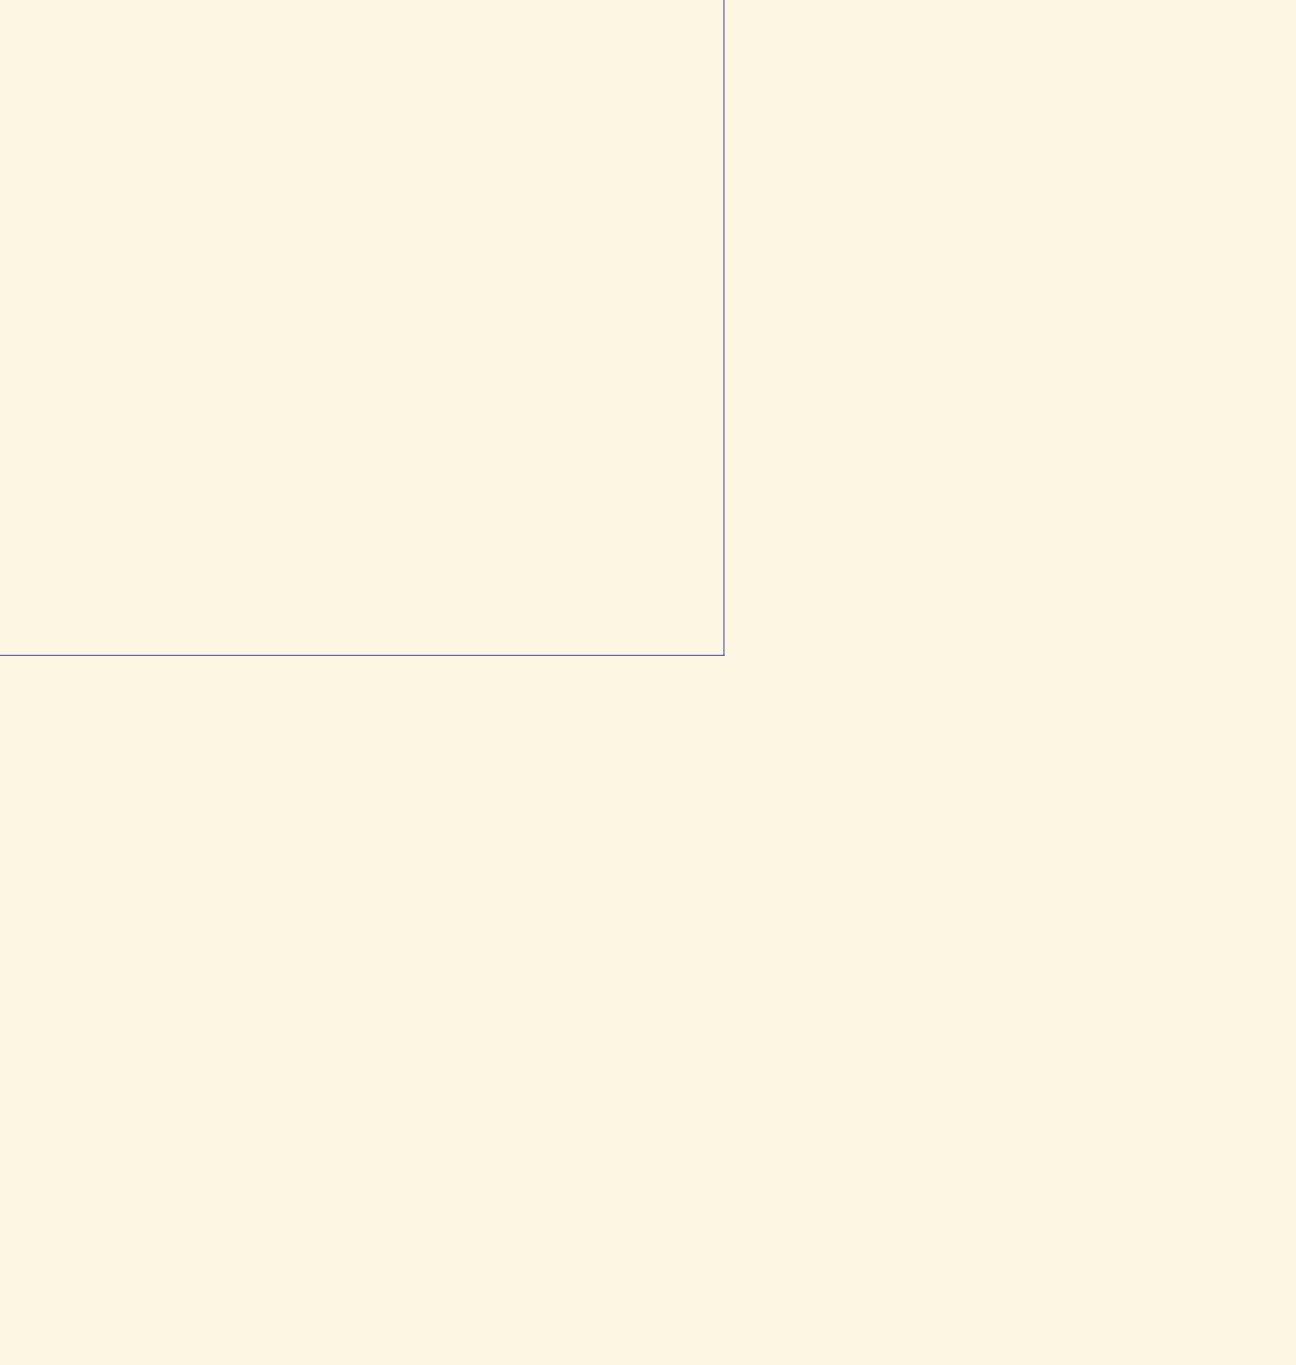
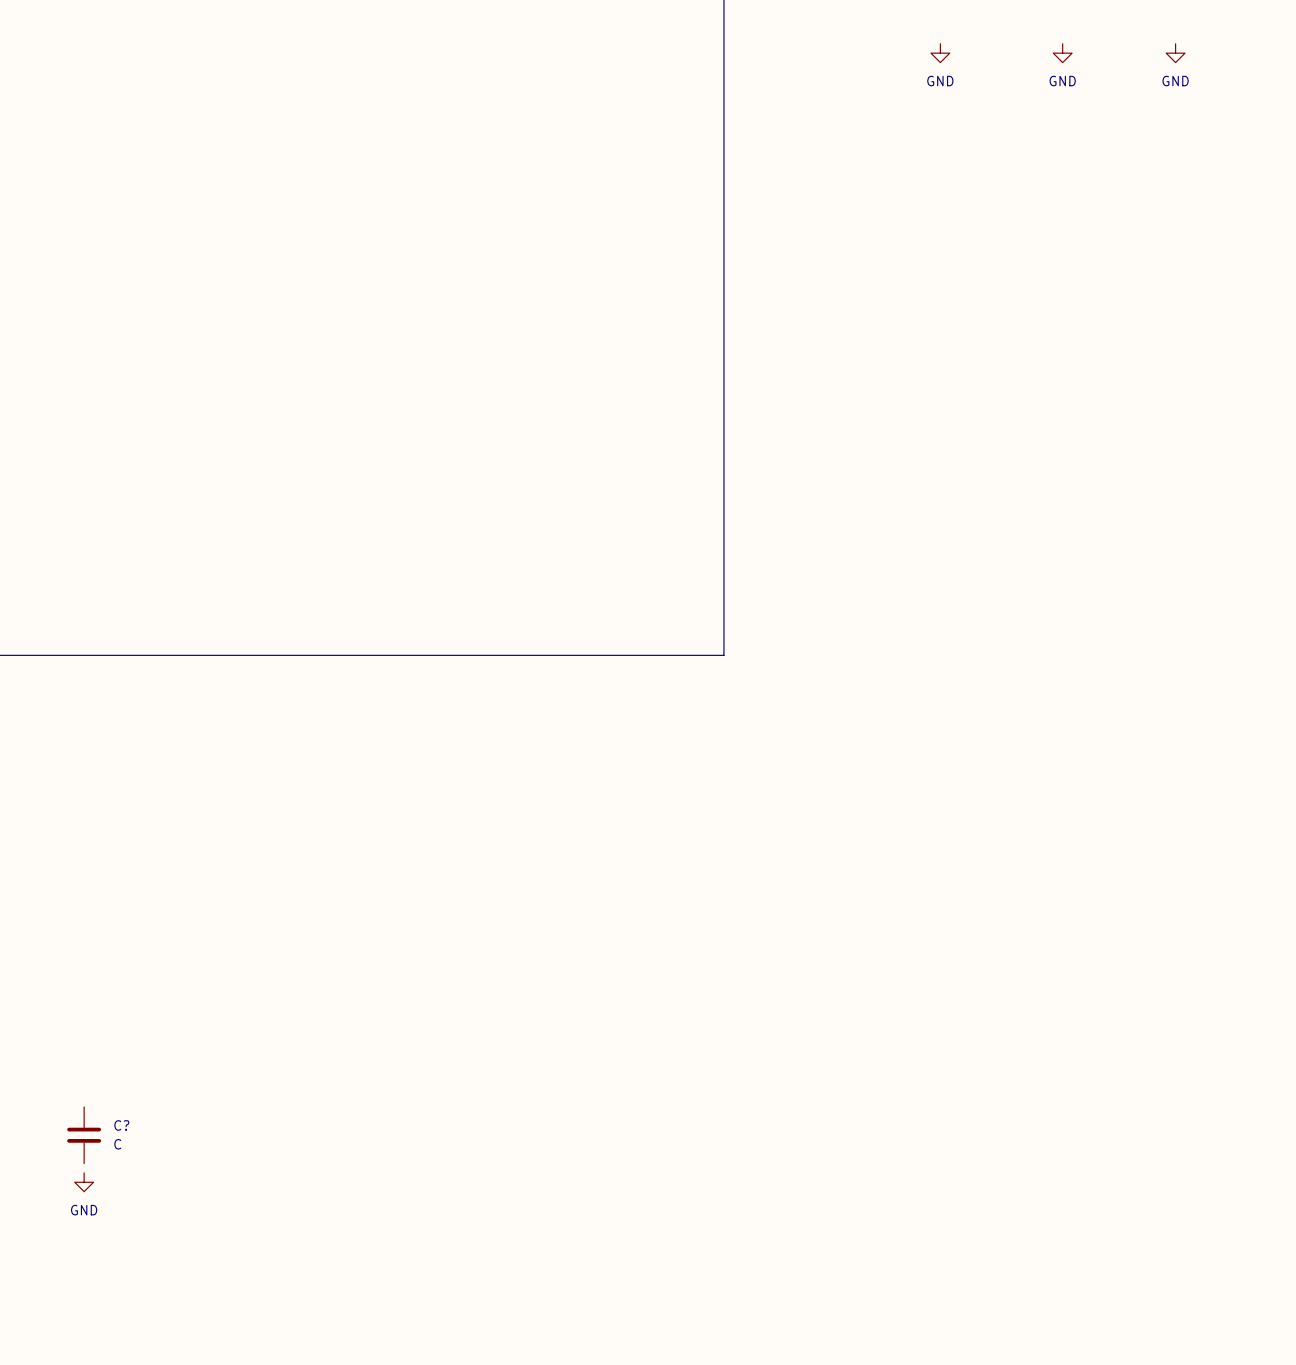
power symbol: none -> GND (940, 53)
power symbol: none -> GND (1062, 53)
power symbol: none -> GND (1175, 53)
C?: none -> C (84, 1135)
power symbol: none -> GND (84, 1182)

